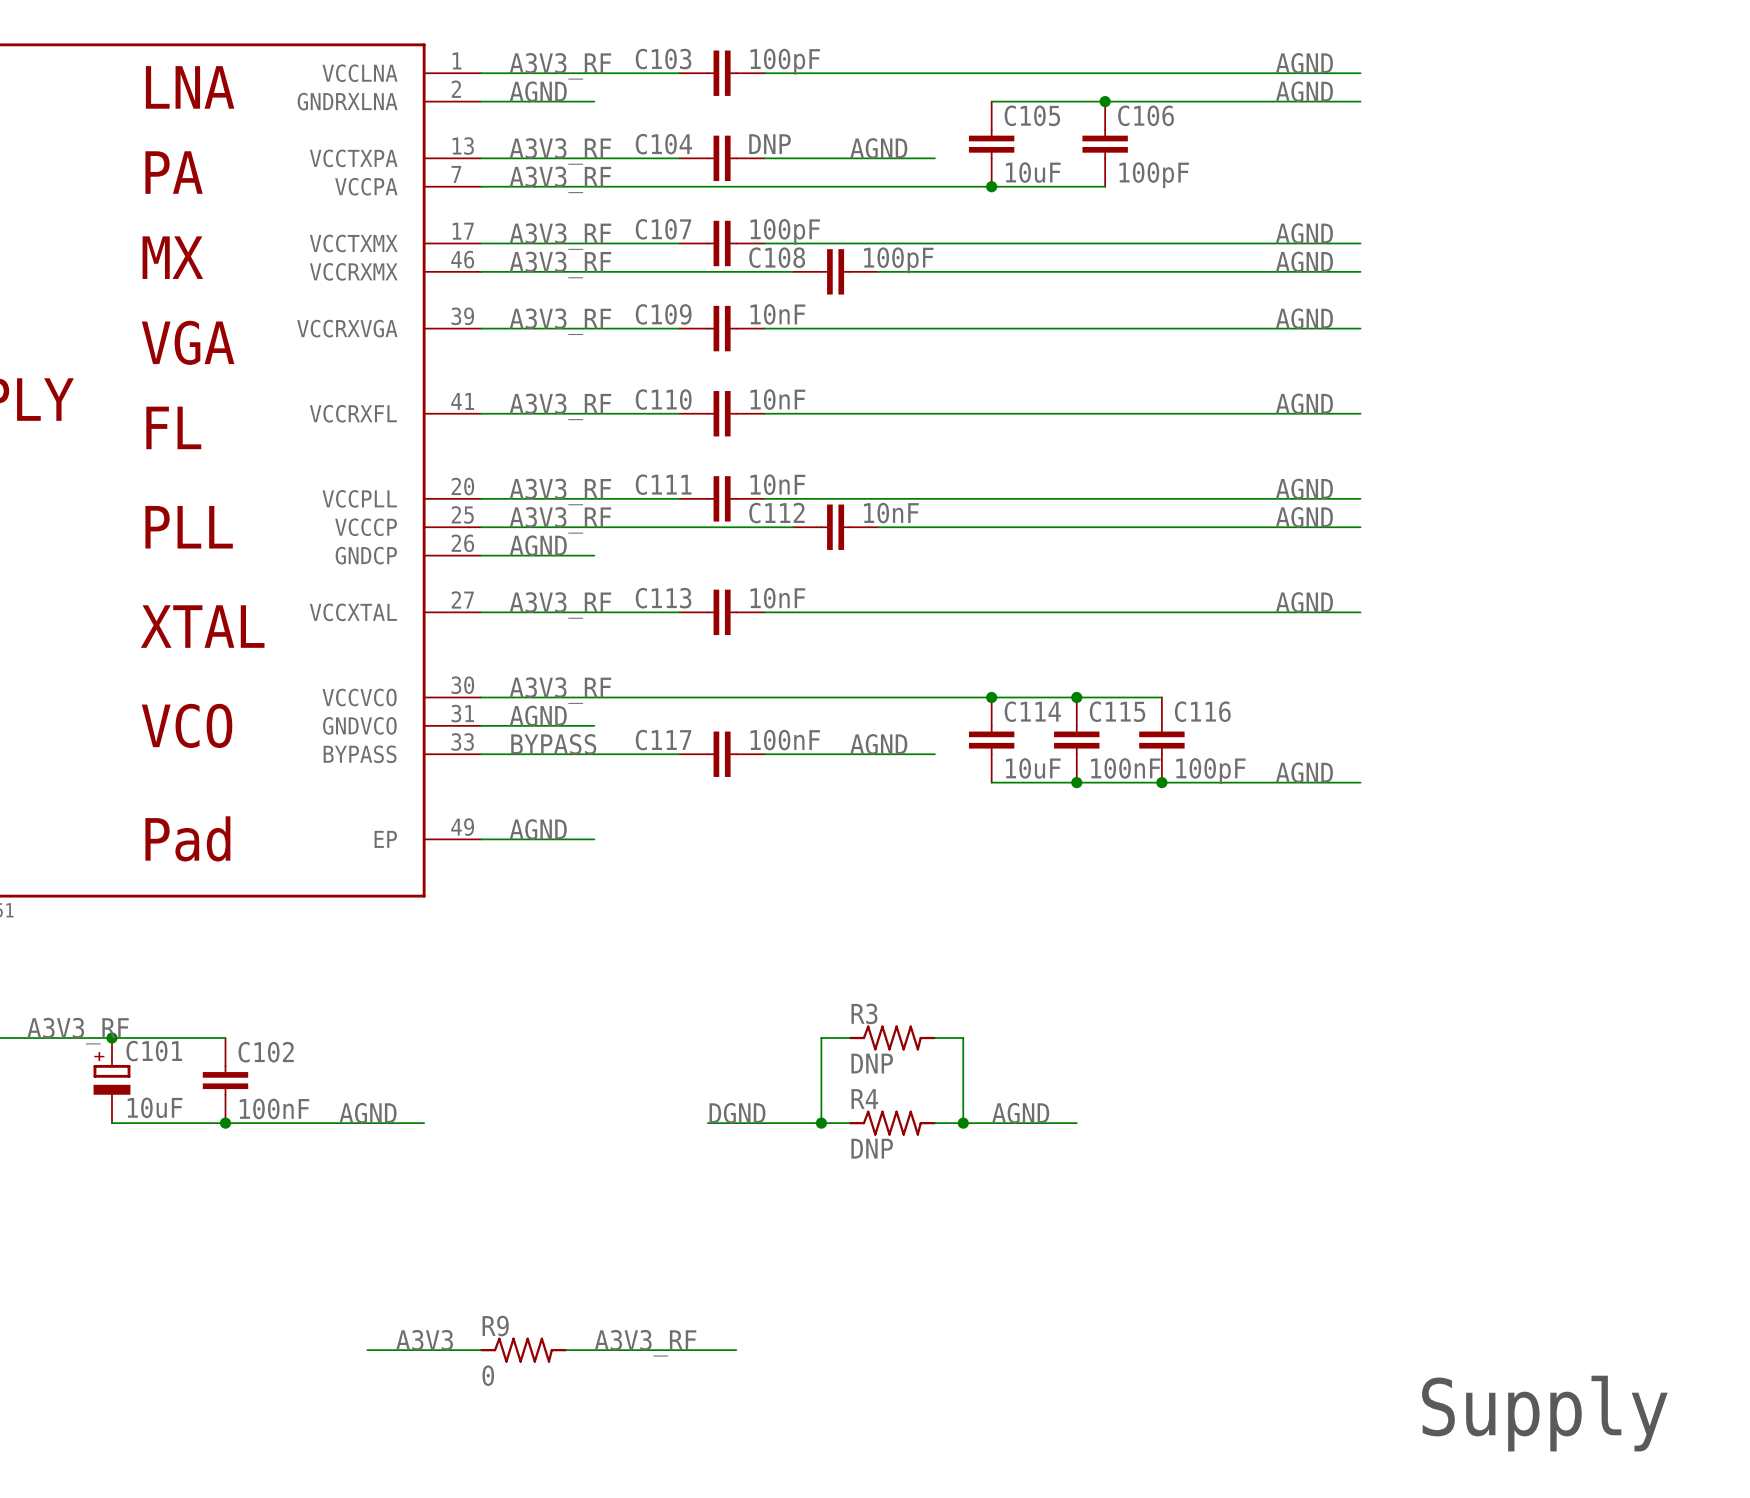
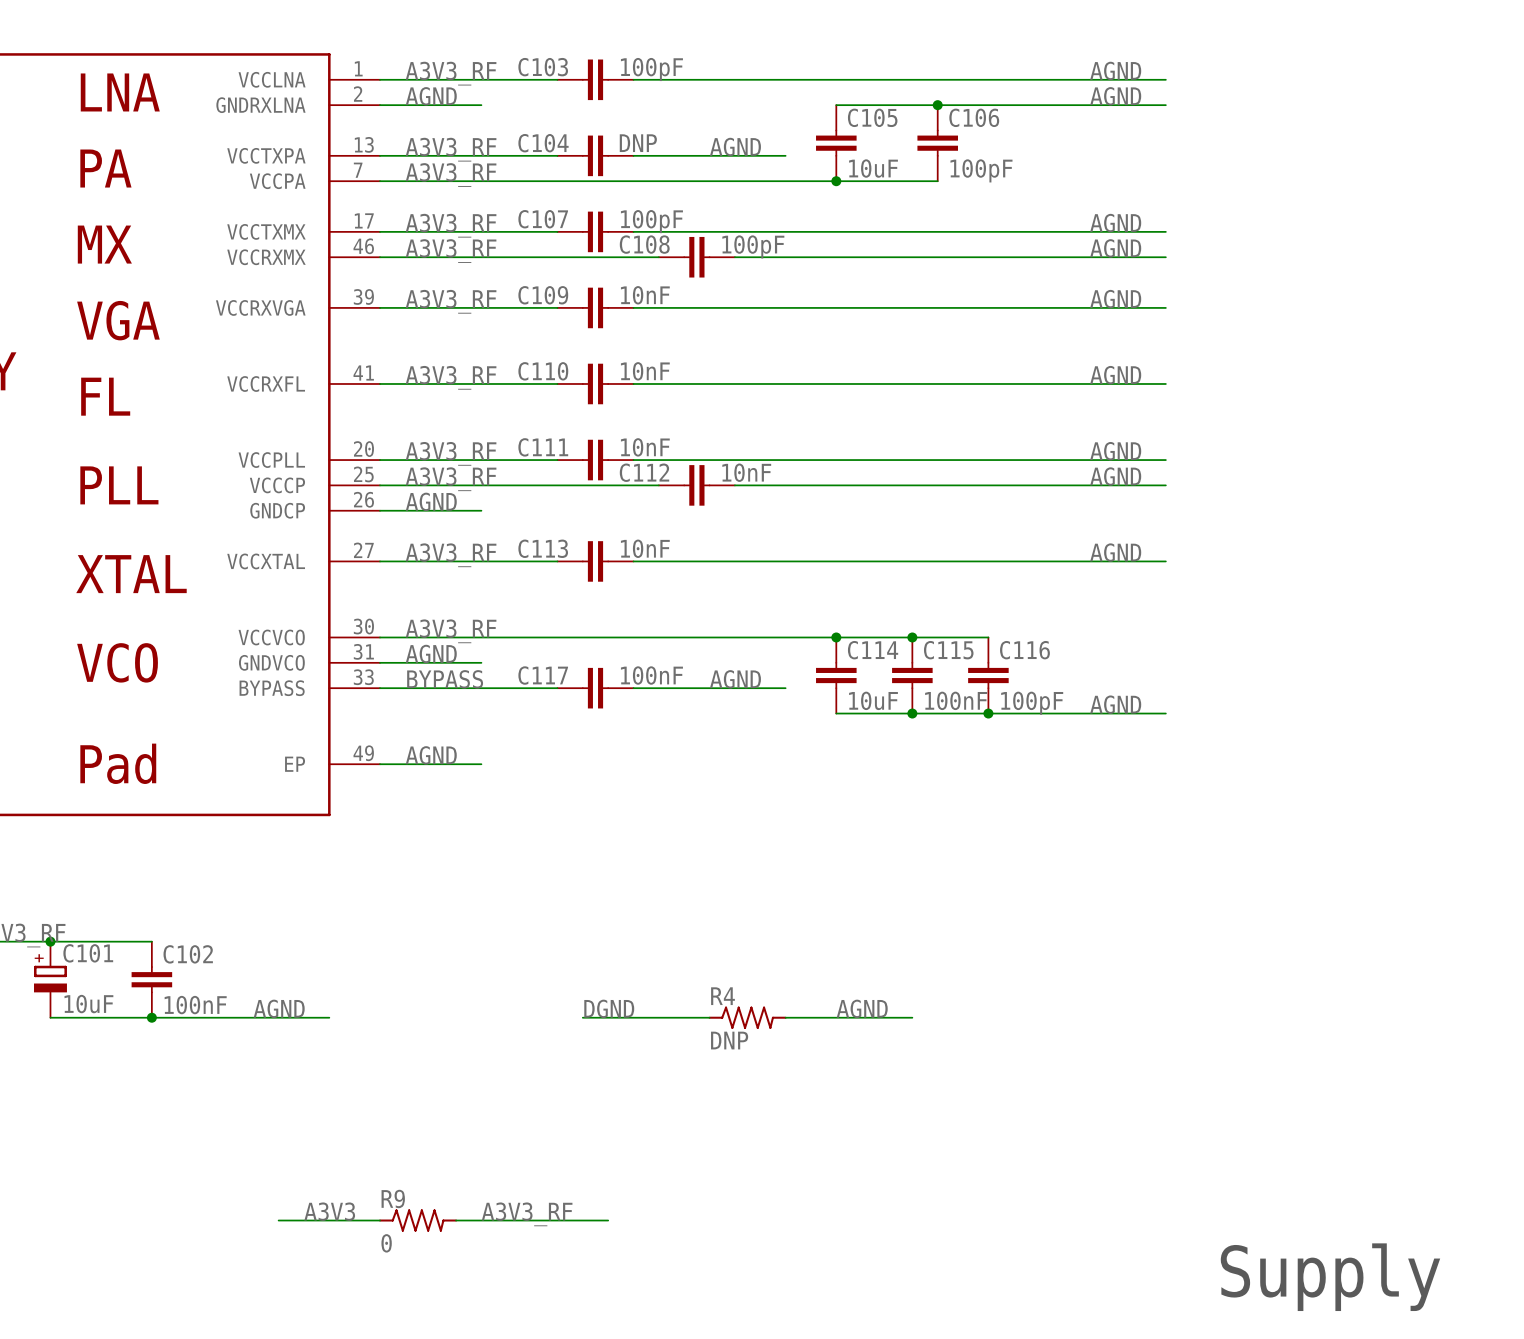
wire: (849, 1038) (821, 1038) (821, 1123) -> none
R3: DNP (892, 1038) -> none
wire: (934, 1038) (963, 1038) (963, 1123) -> none
junction: (821, 1123) -> none
junction: (963, 1123) -> none

